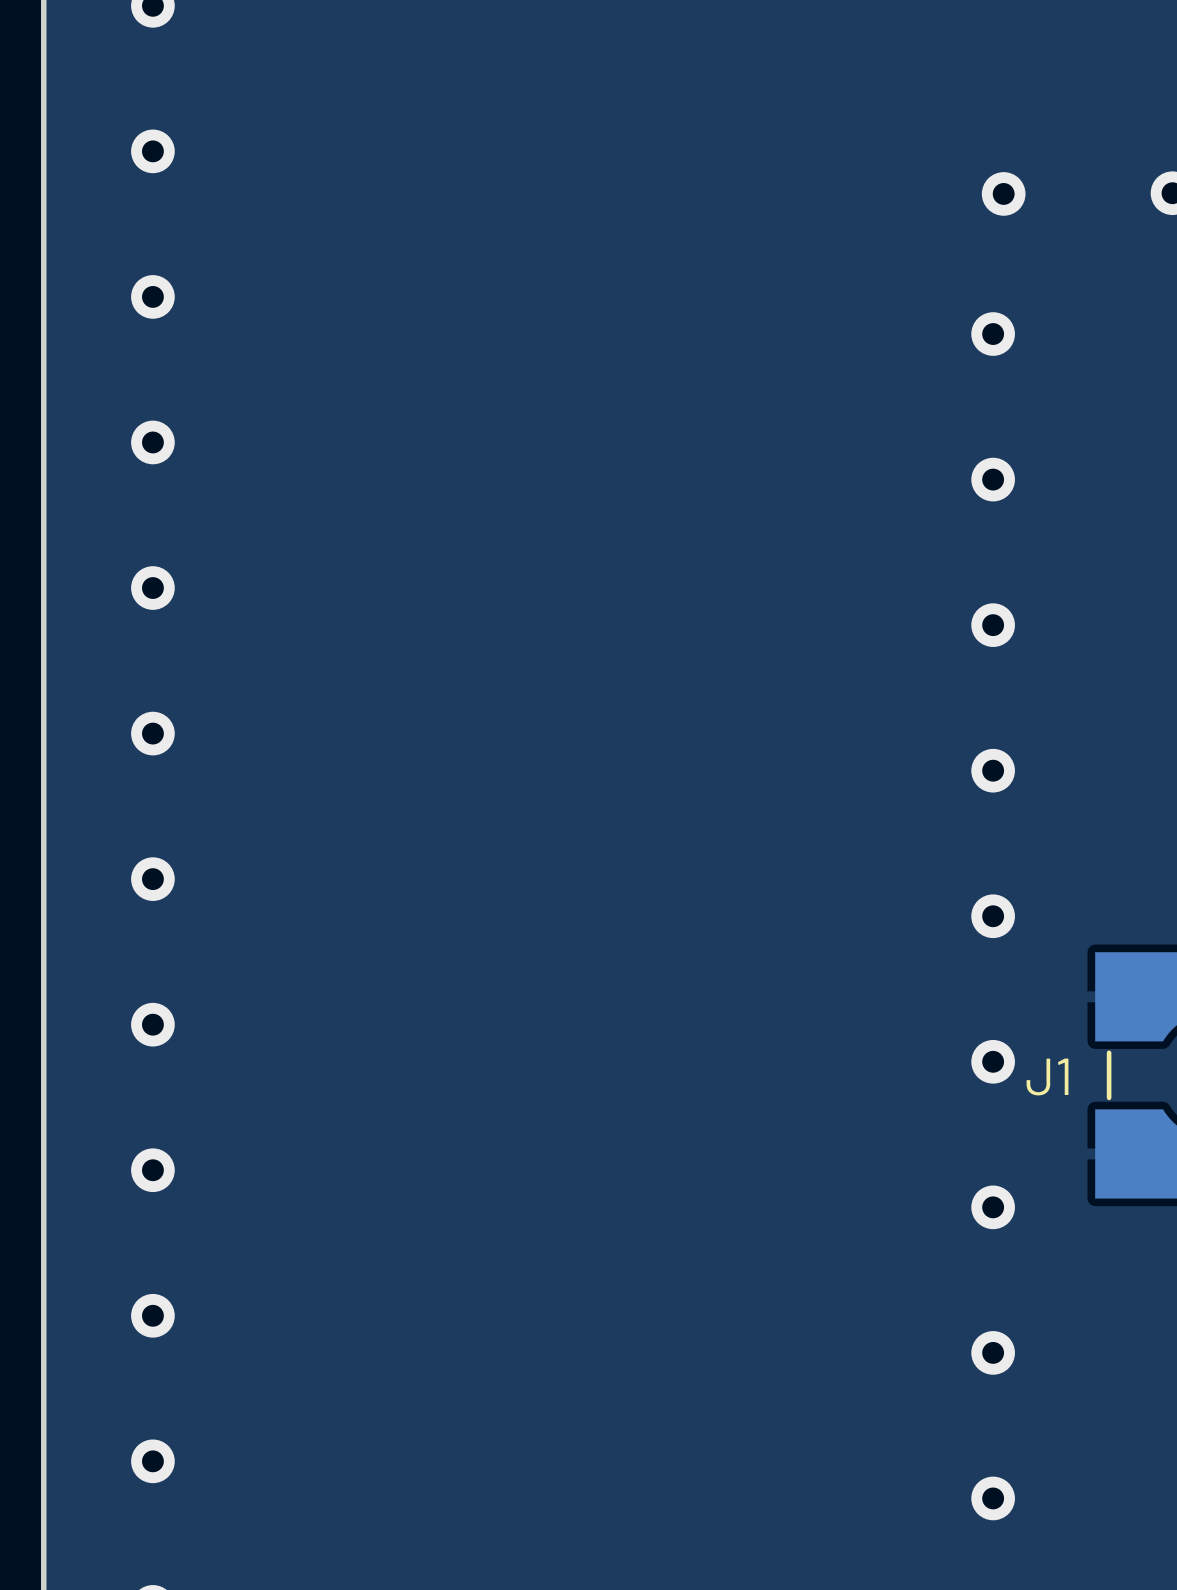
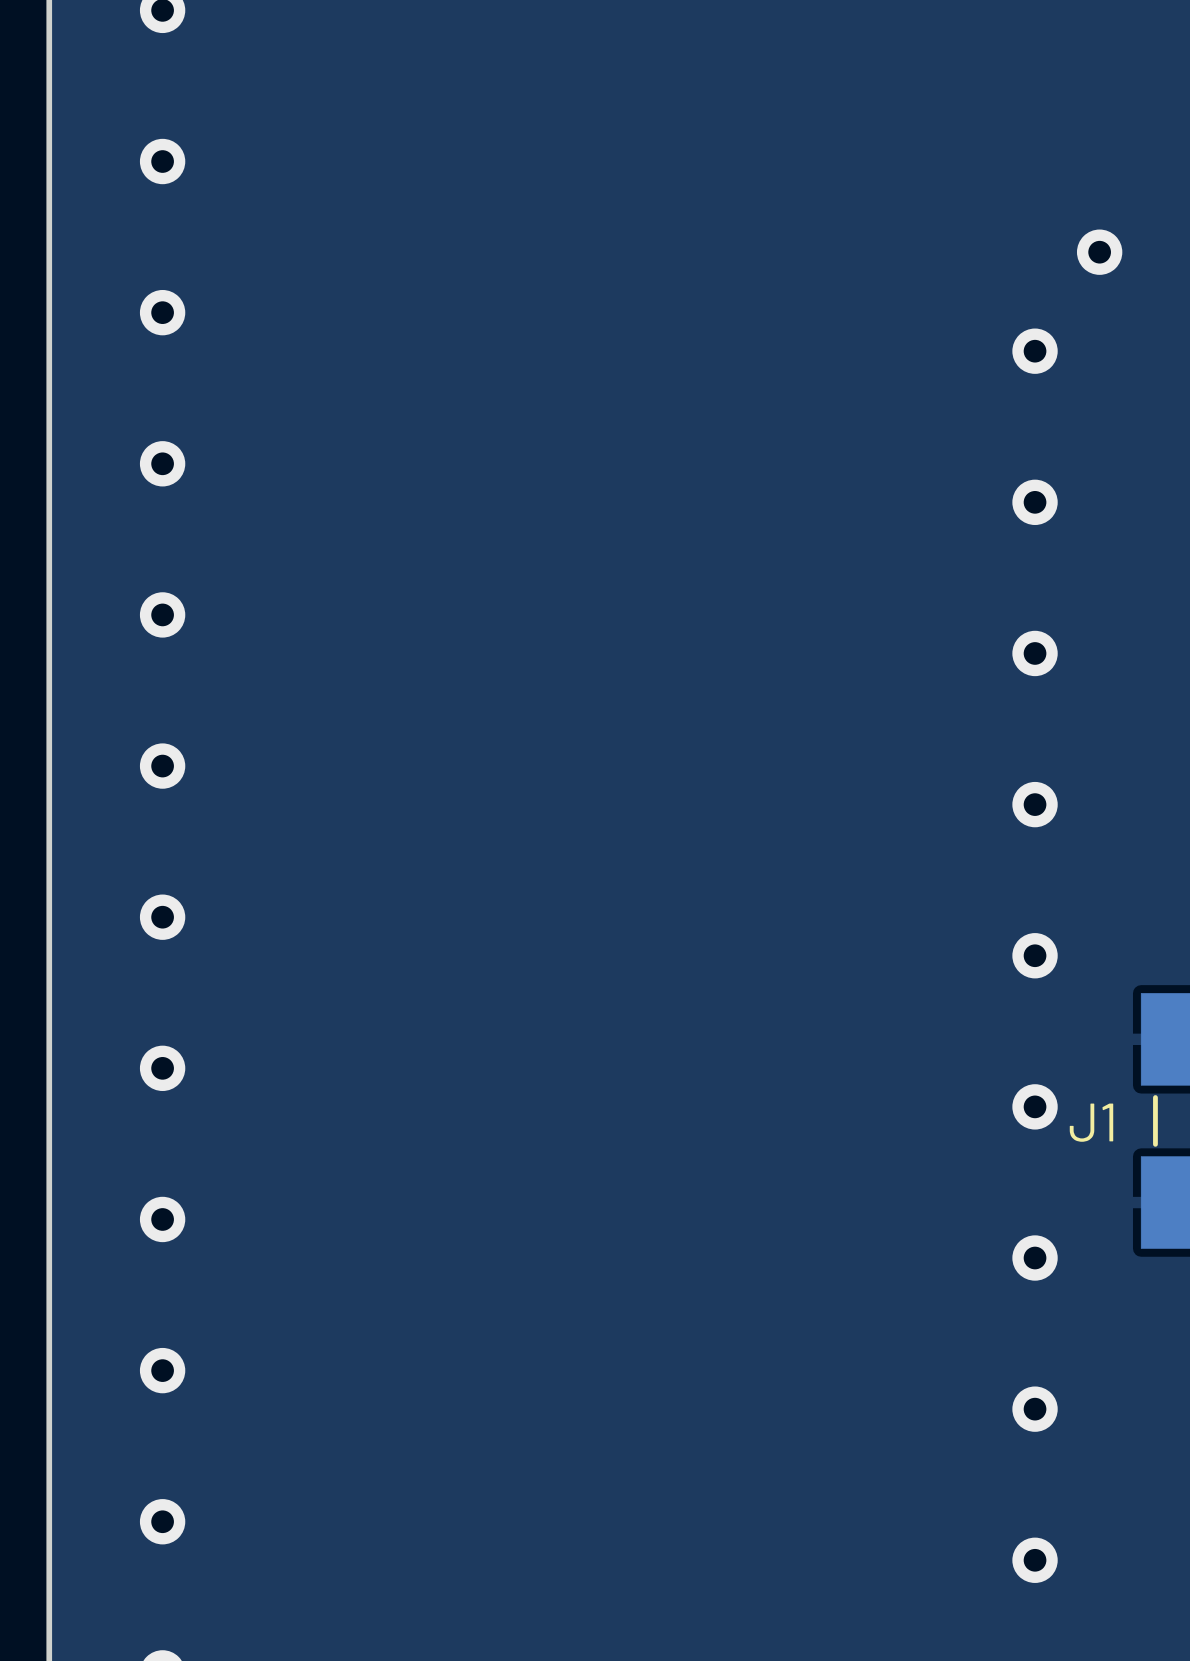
via position: (1003, 193) -> (1099, 252)

